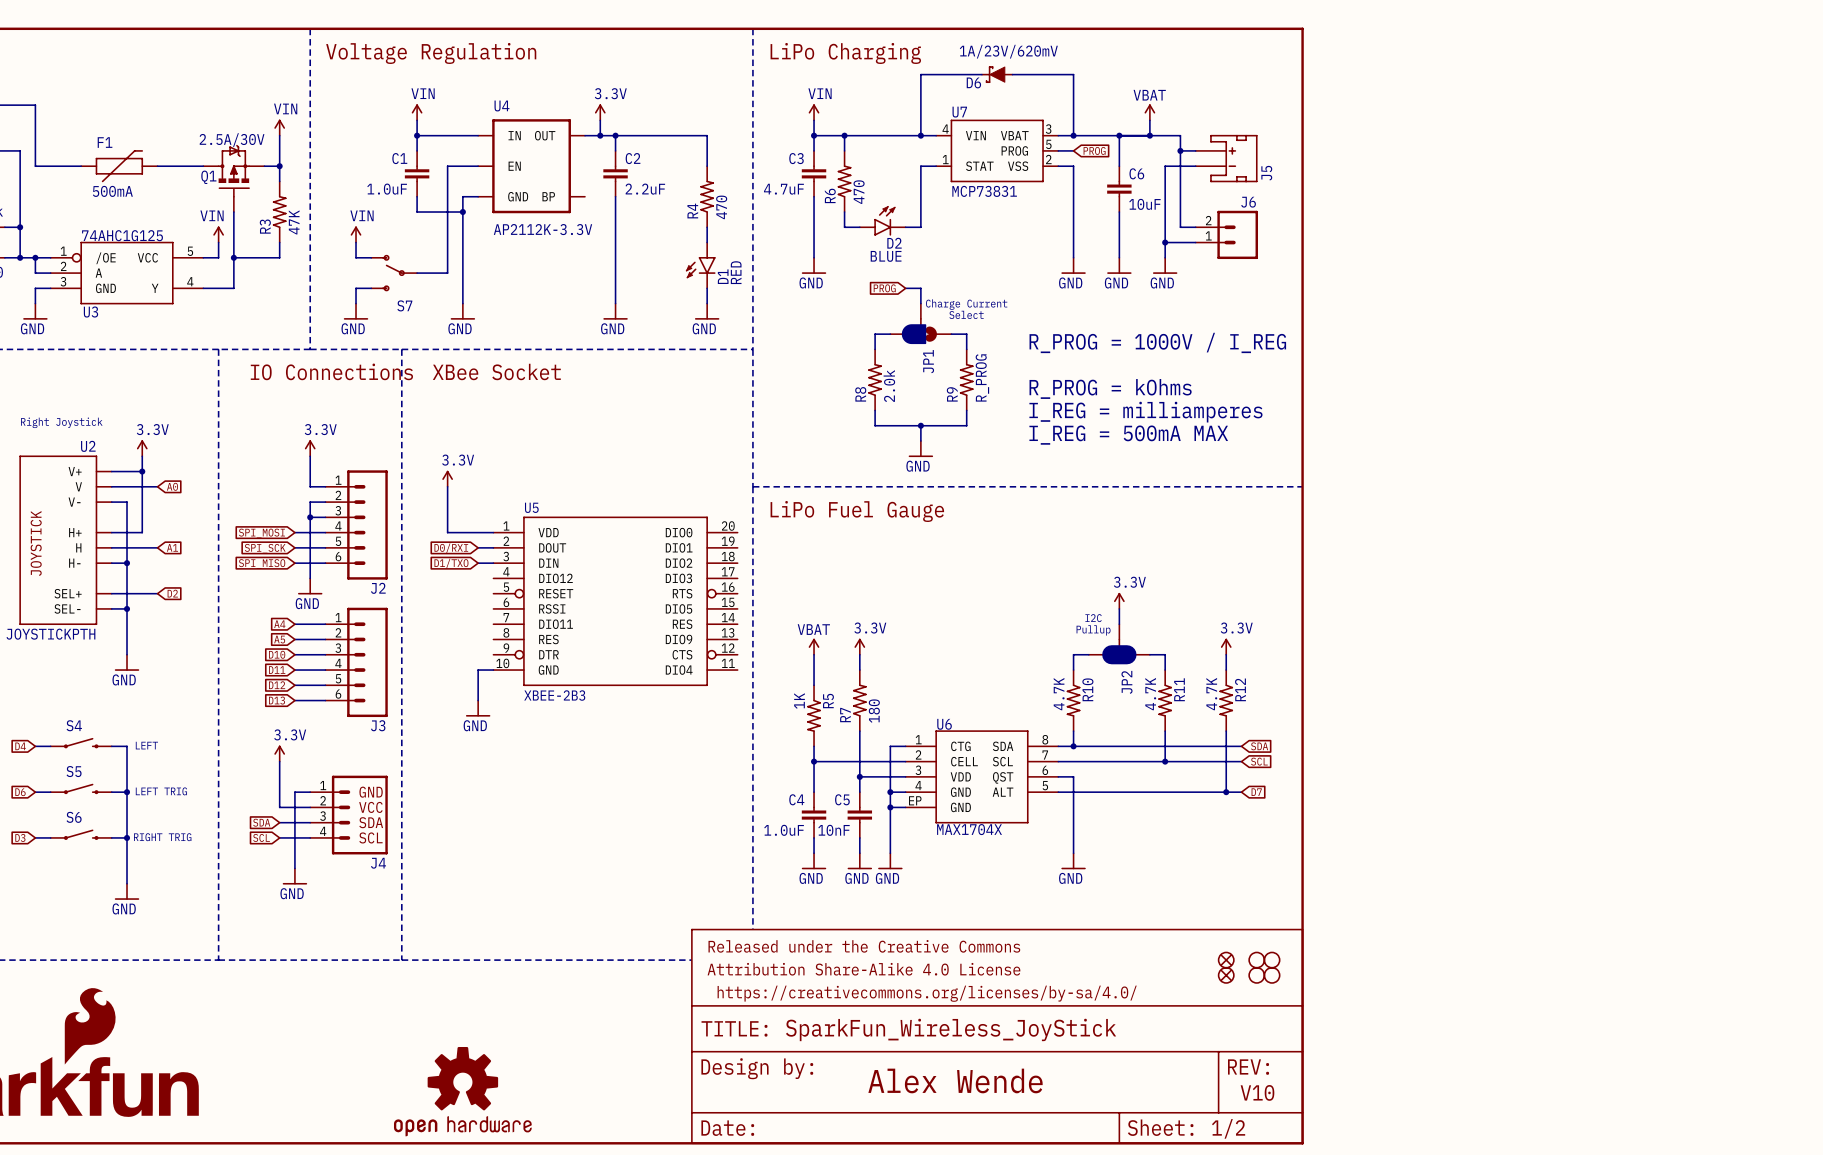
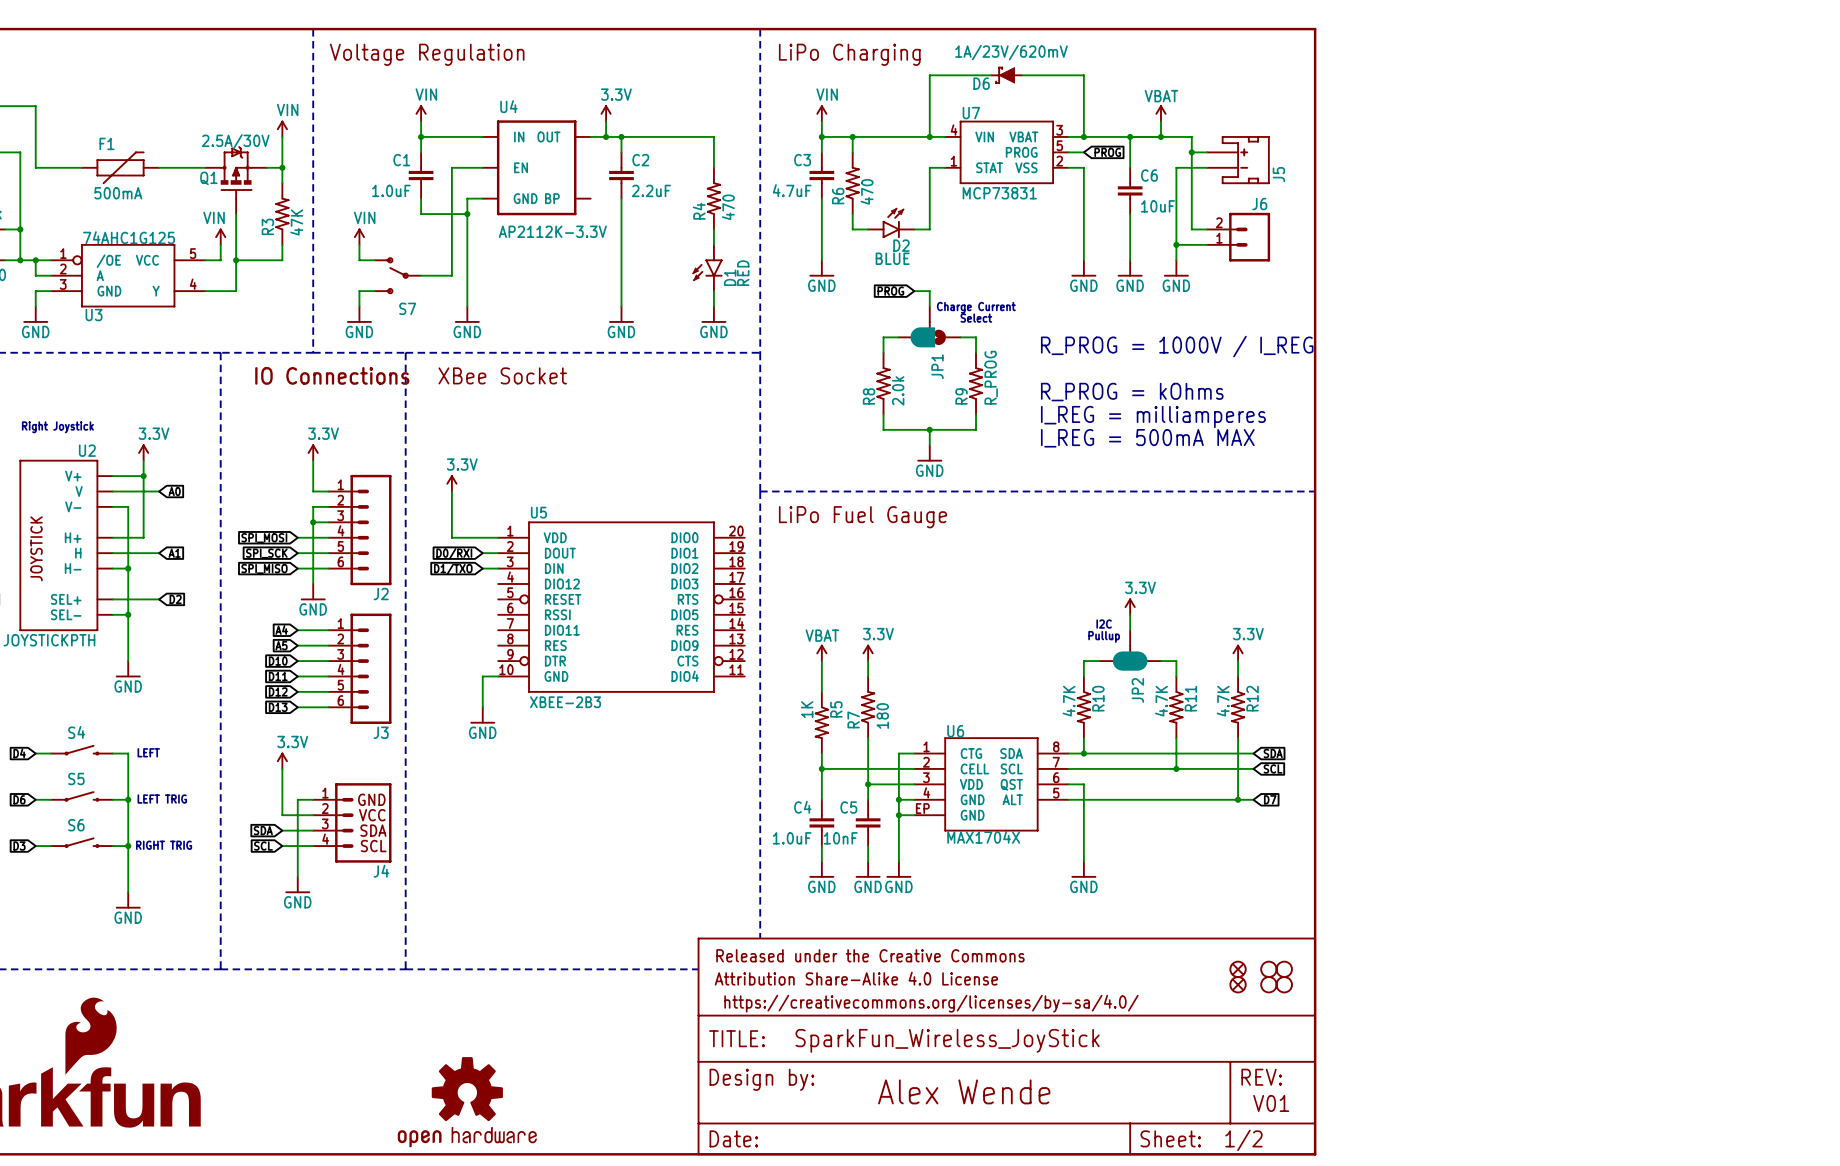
text: V10 (1257, 1092) -> V01 (1271, 1103)

